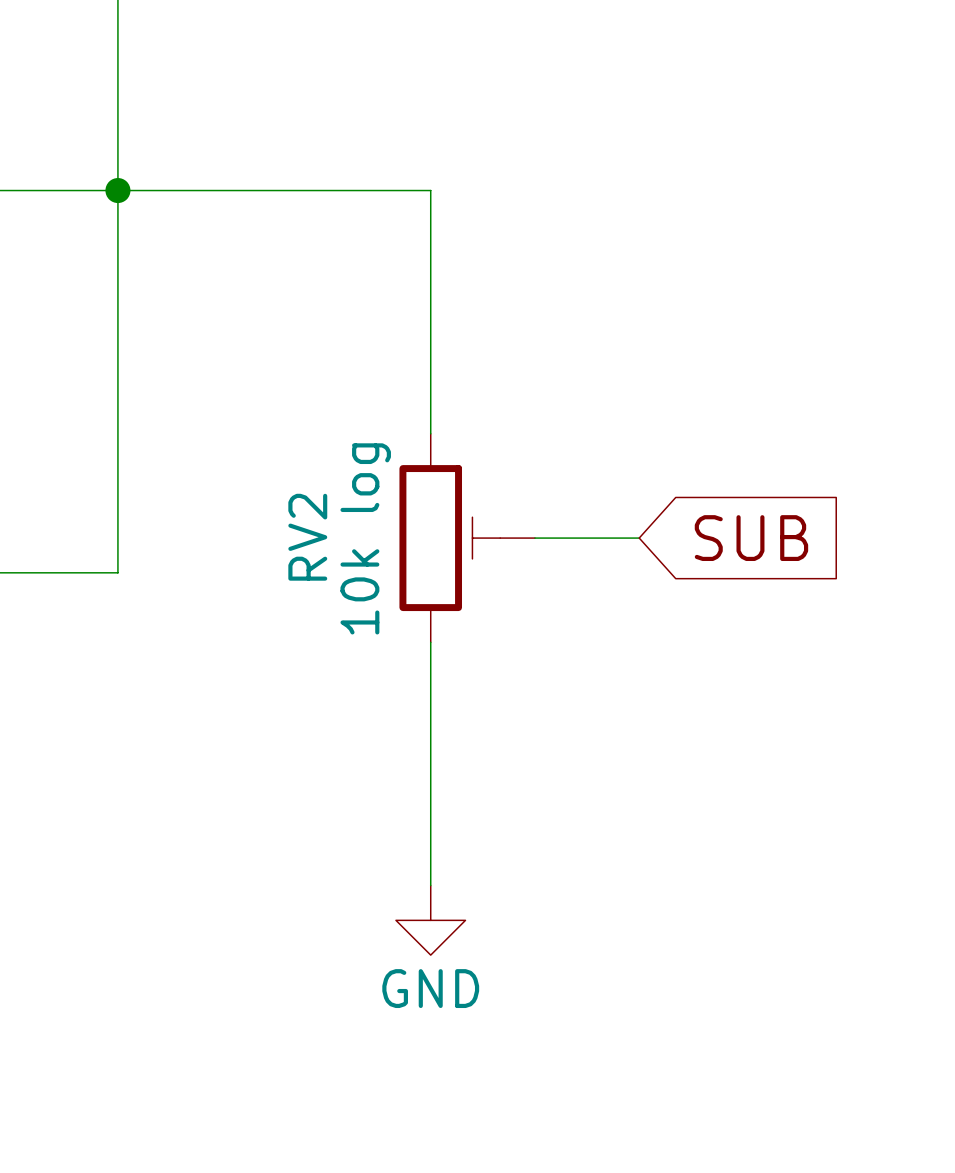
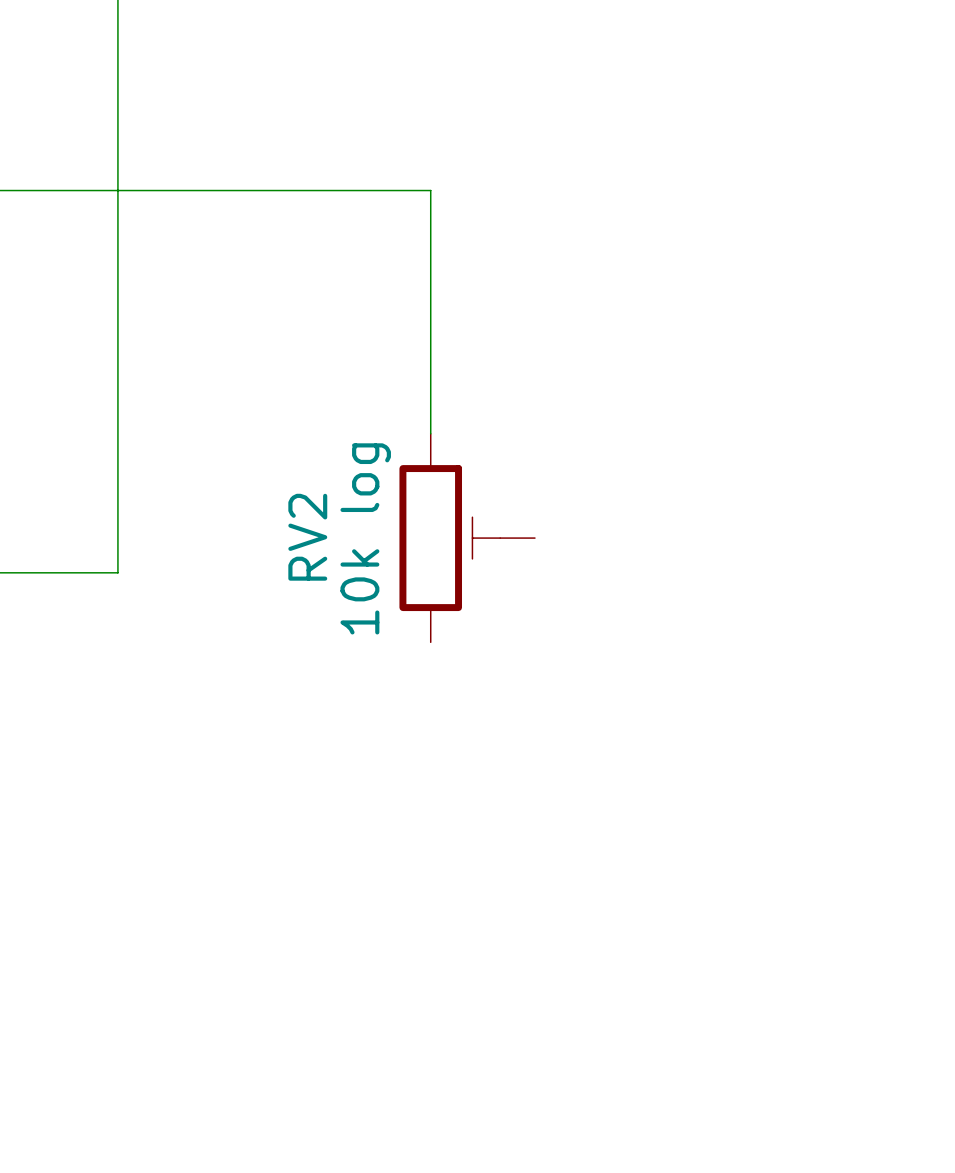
junction: (117, 190) -> none
wire: (534, 538) (639, 538) -> none
global label: SUB (751, 538) -> none
wire: (430, 642) (430, 885) -> none
power symbol: GND (430, 920) -> none

